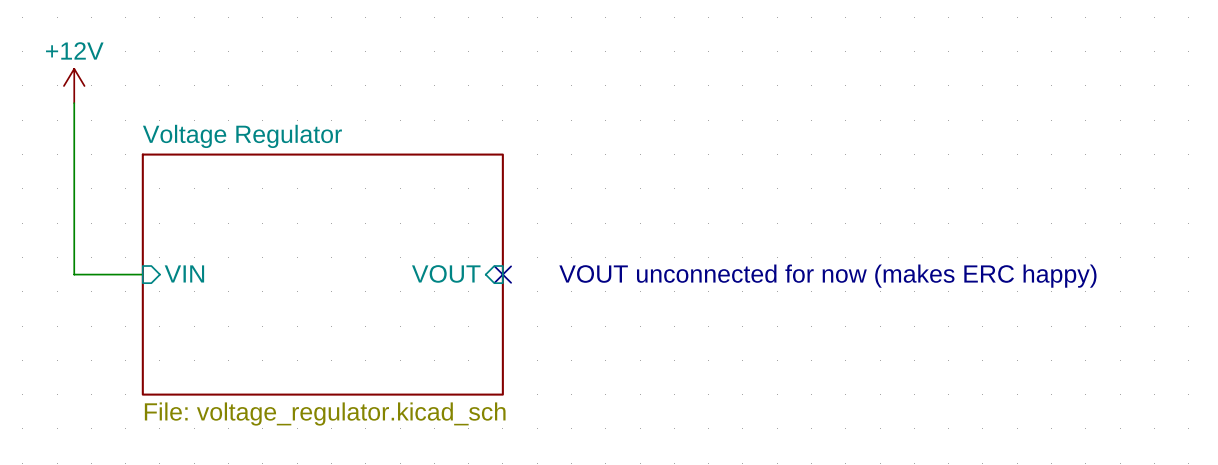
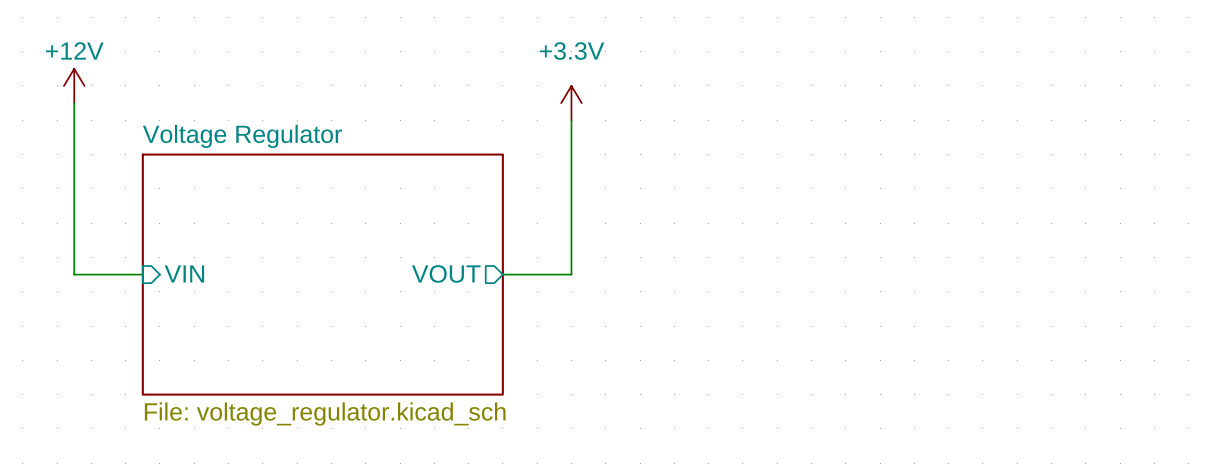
power symbol: none -> +3.3V (571, 103)
wire: none -> (571, 120) (571, 274) (502, 274)
sheet pin shape: input (446, 273) -> output (446, 273)
no-connect mark: (502, 274) -> none
text: VOUT unconnected for now (makes ERC happy) (827, 276) -> none

